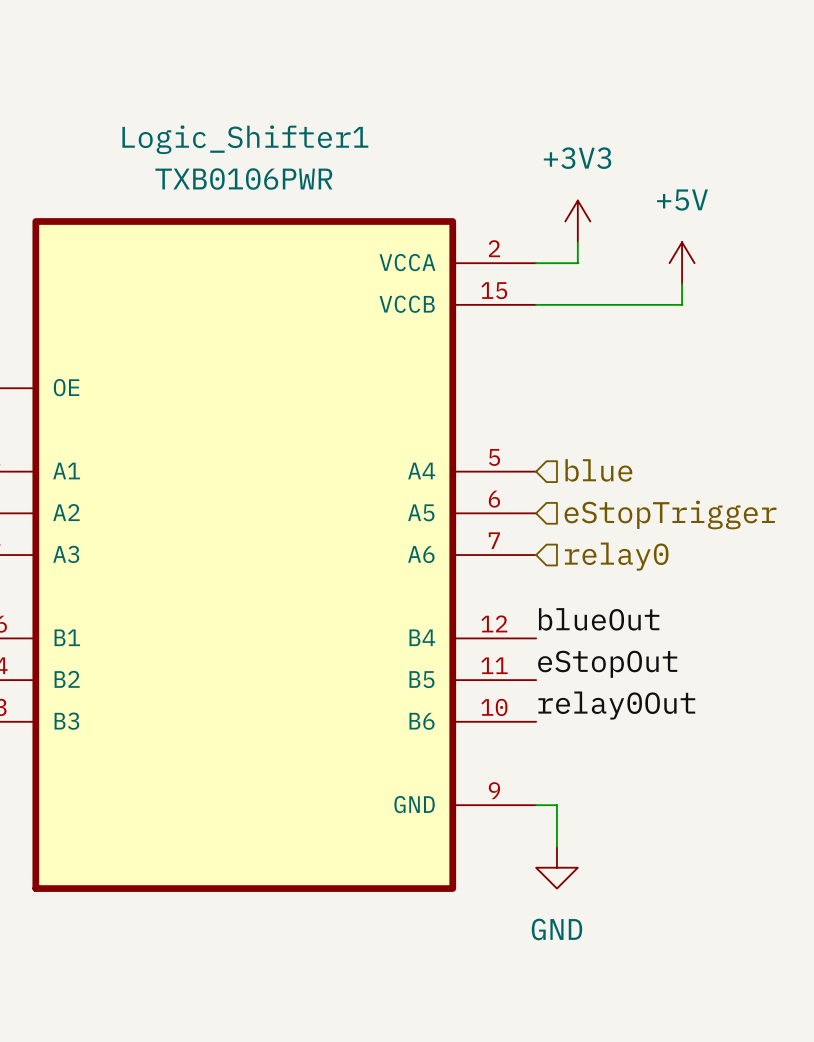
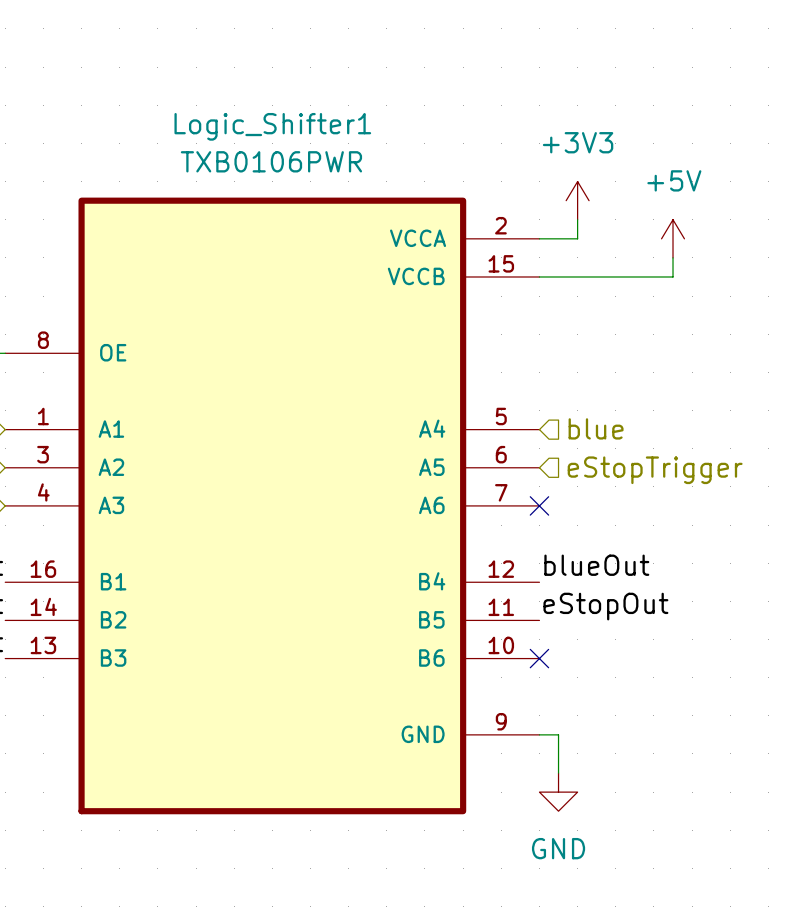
no-connect mark: none -> (539, 505)
hierarchical label: relay0 (616, 556) -> none
label: relay0Out (616, 705) -> none
no-connect mark: none -> (539, 658)

